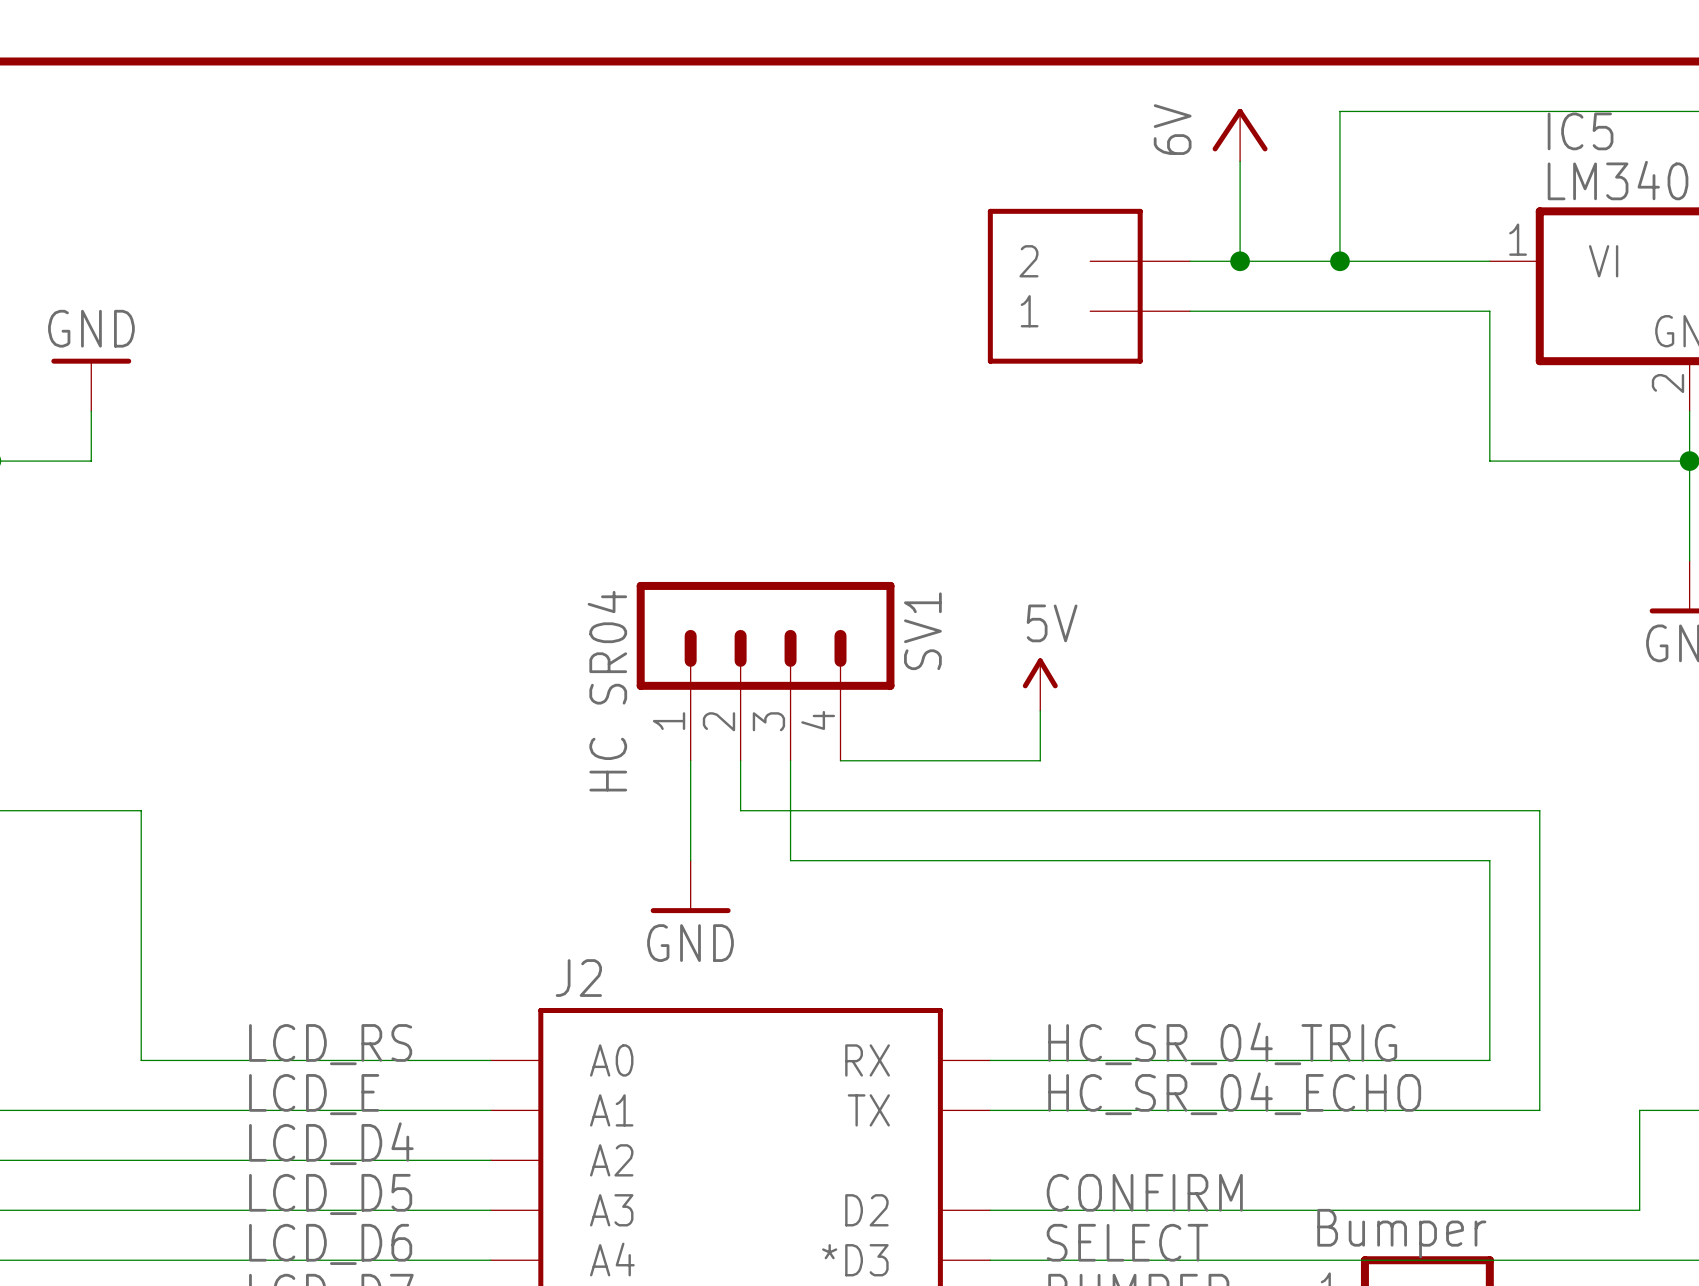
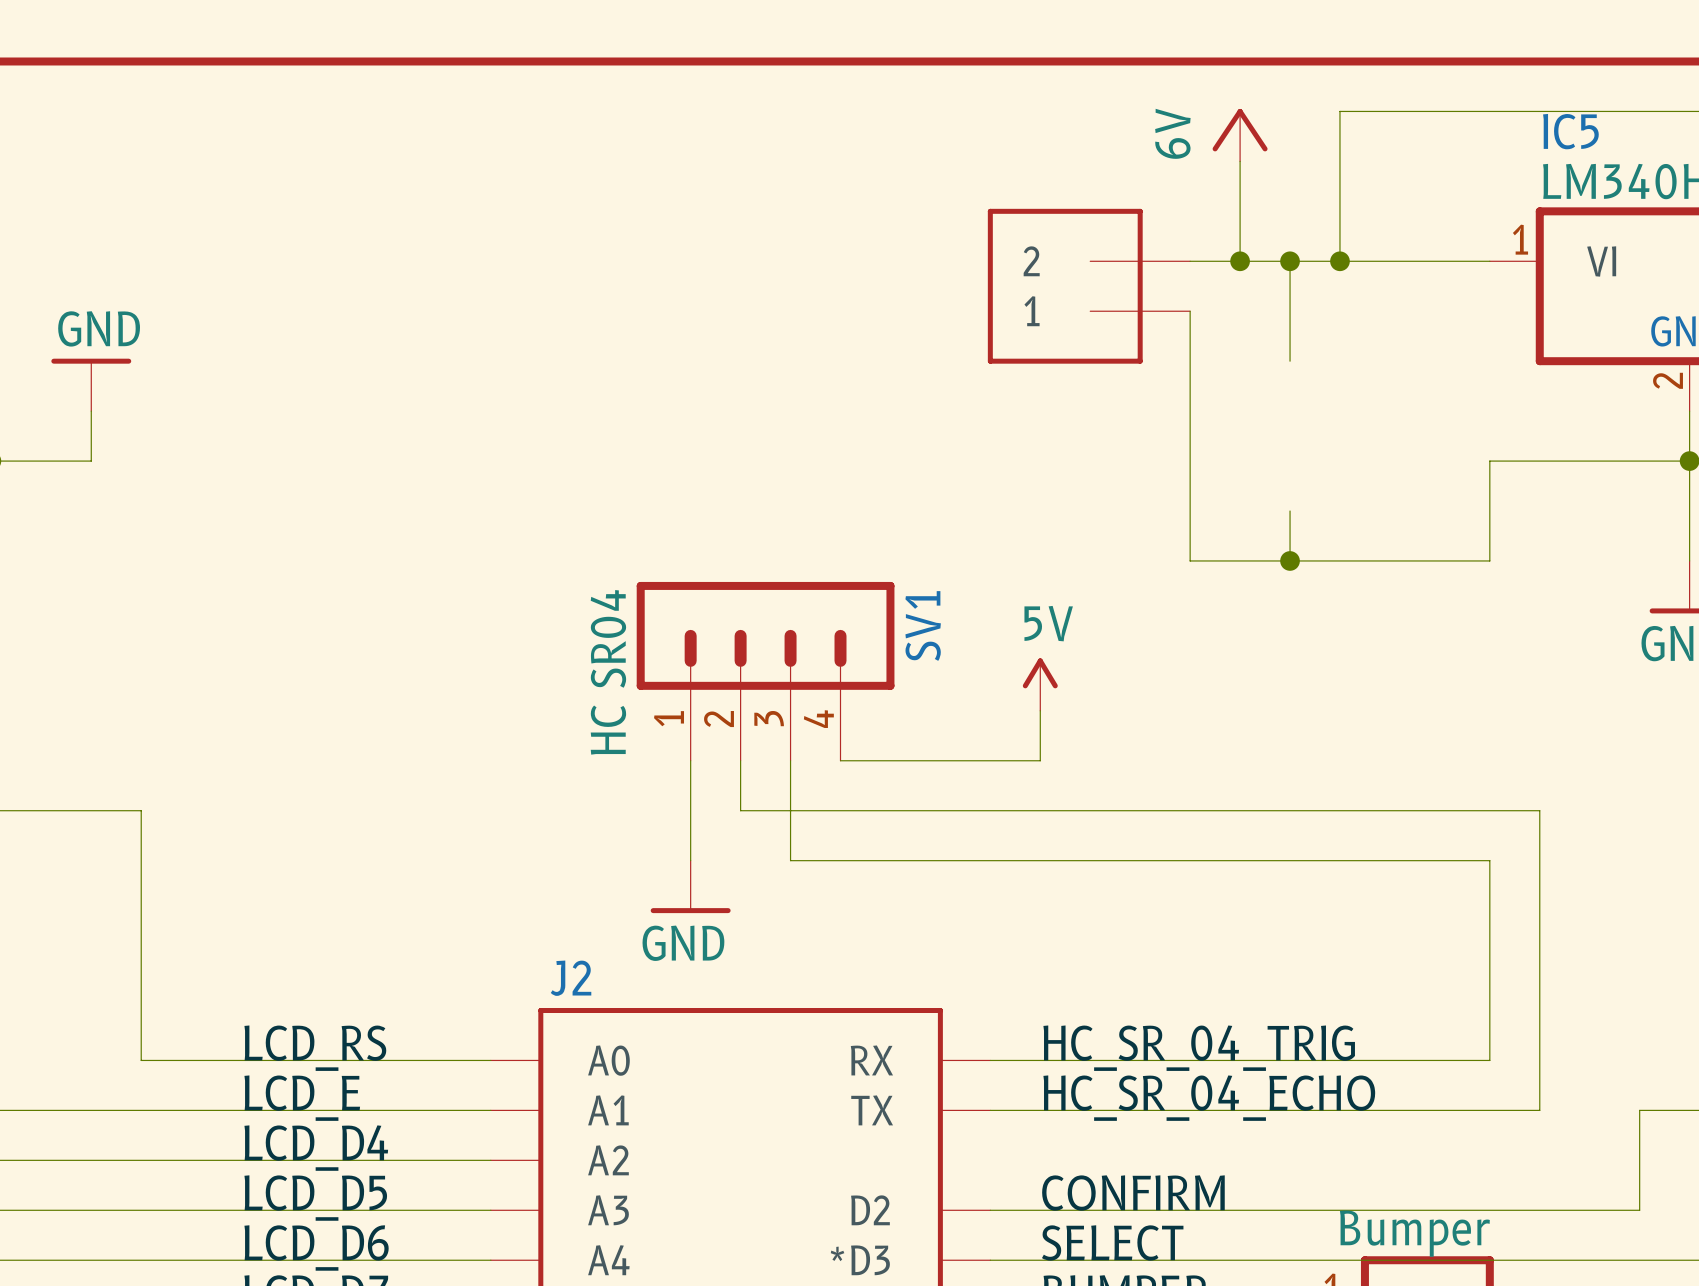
wire: none -> (1290, 261) (1290, 361)
junction: none -> (1290, 261)
wire: (1190, 311) (1489, 311) (1489, 461) -> (1190, 311) (1190, 560) (1489, 560) (1489, 461)
wire: none -> (1290, 511) (1290, 560)
junction: none -> (1290, 560)

